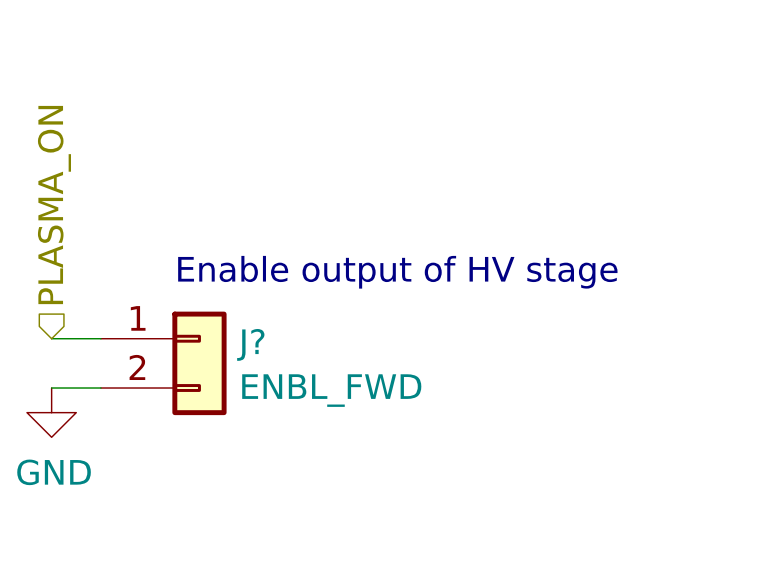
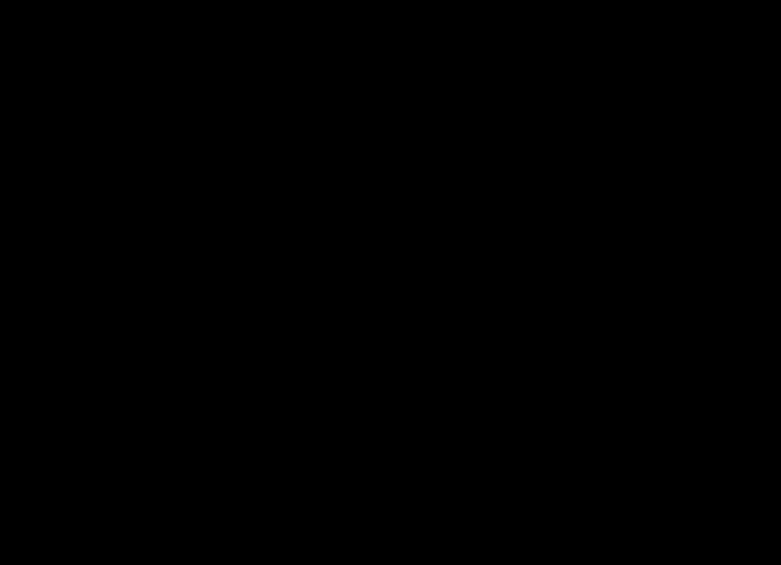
hierarchical label: PLASMA_ON (54, 205) -> none
text: Enable output of HV stage (397, 272) -> none
wire: (51, 338) (100, 338) -> none
J?: ENBL_FWD (163, 363) -> none
wire: (51, 388) (100, 388) -> none
power symbol: GND (51, 412) -> none

